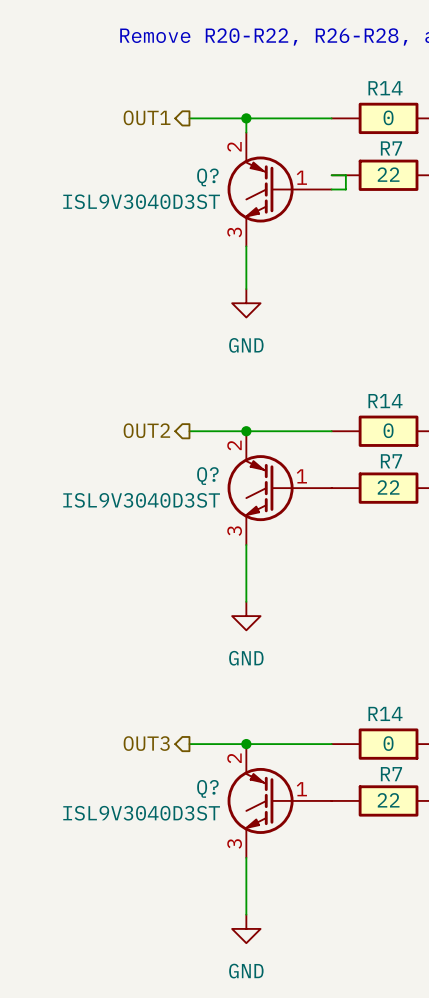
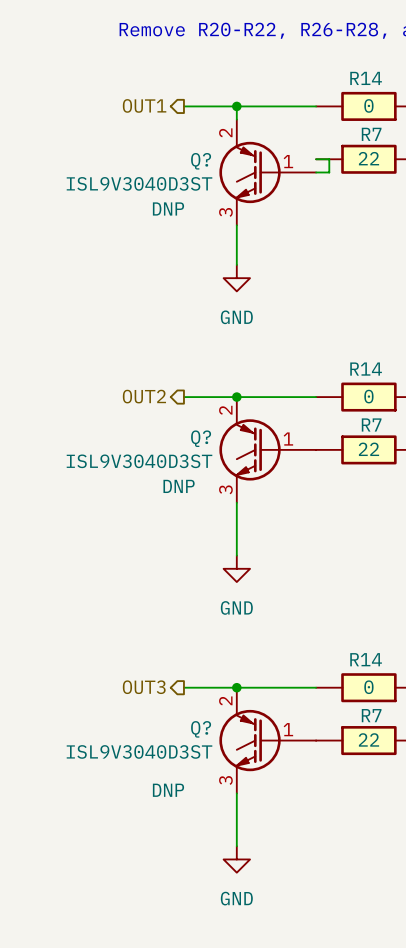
Q? text: none -> DNP (168, 208)
Q? text: none -> DNP (179, 486)
Q? text: none -> DNP (168, 790)

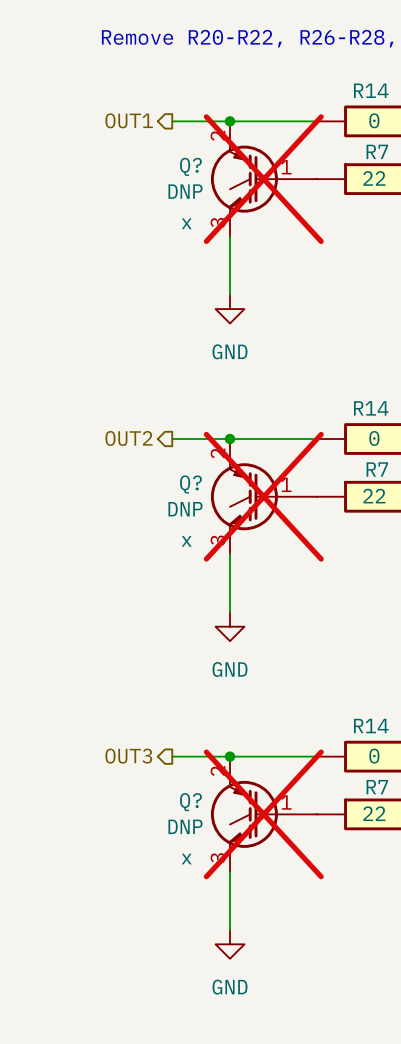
Q?: none -> DNP (263, 179)
wire: (316, 159) (329, 159) (329, 172) (316, 172) -> none
Q?: ISL9V3040D3ST (267, 172) -> none
Q? do-not-place cross: none -> (263, 496)
Q? value: ISL9V3040D3ST (139, 461) -> DNP (185, 509)
Q? text: DNP (179, 486) -> none
Q? text: none -> x (186, 541)
Q? do-not-place cross: none -> (263, 814)
Q? value: ISL9V3040D3ST (139, 751) -> DNP (185, 826)
Q? text: none -> x (186, 859)
Q? text: DNP (168, 790) -> none

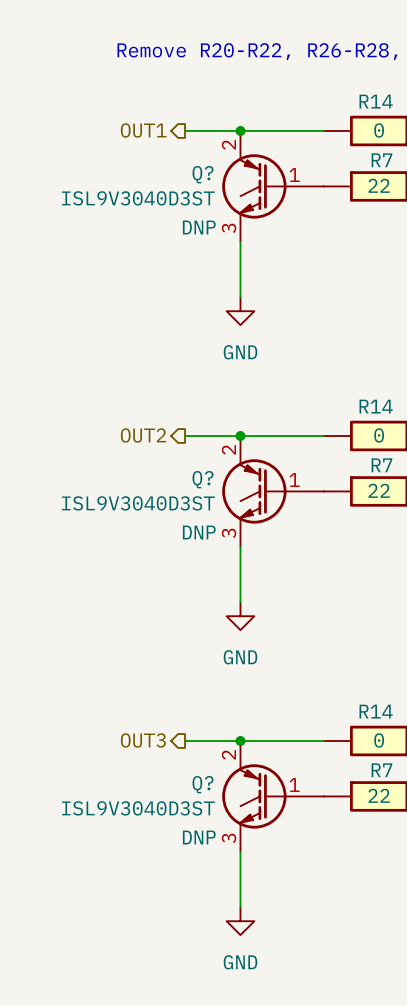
Q? do-not-place cross: (263, 179) -> none
Q? value: DNP (185, 191) -> ISL9V3040D3ST (138, 198)
Q? text: x (186, 223) -> DNP (199, 227)
Q? do-not-place cross: (263, 496) -> none
Q? value: DNP (185, 509) -> ISL9V3040D3ST (138, 503)
Q? text: x (186, 541) -> DNP (199, 532)
Q? do-not-place cross: (263, 814) -> none
Q? value: DNP (185, 826) -> ISL9V3040D3ST (138, 808)
Q? text: x (186, 859) -> DNP (199, 837)

